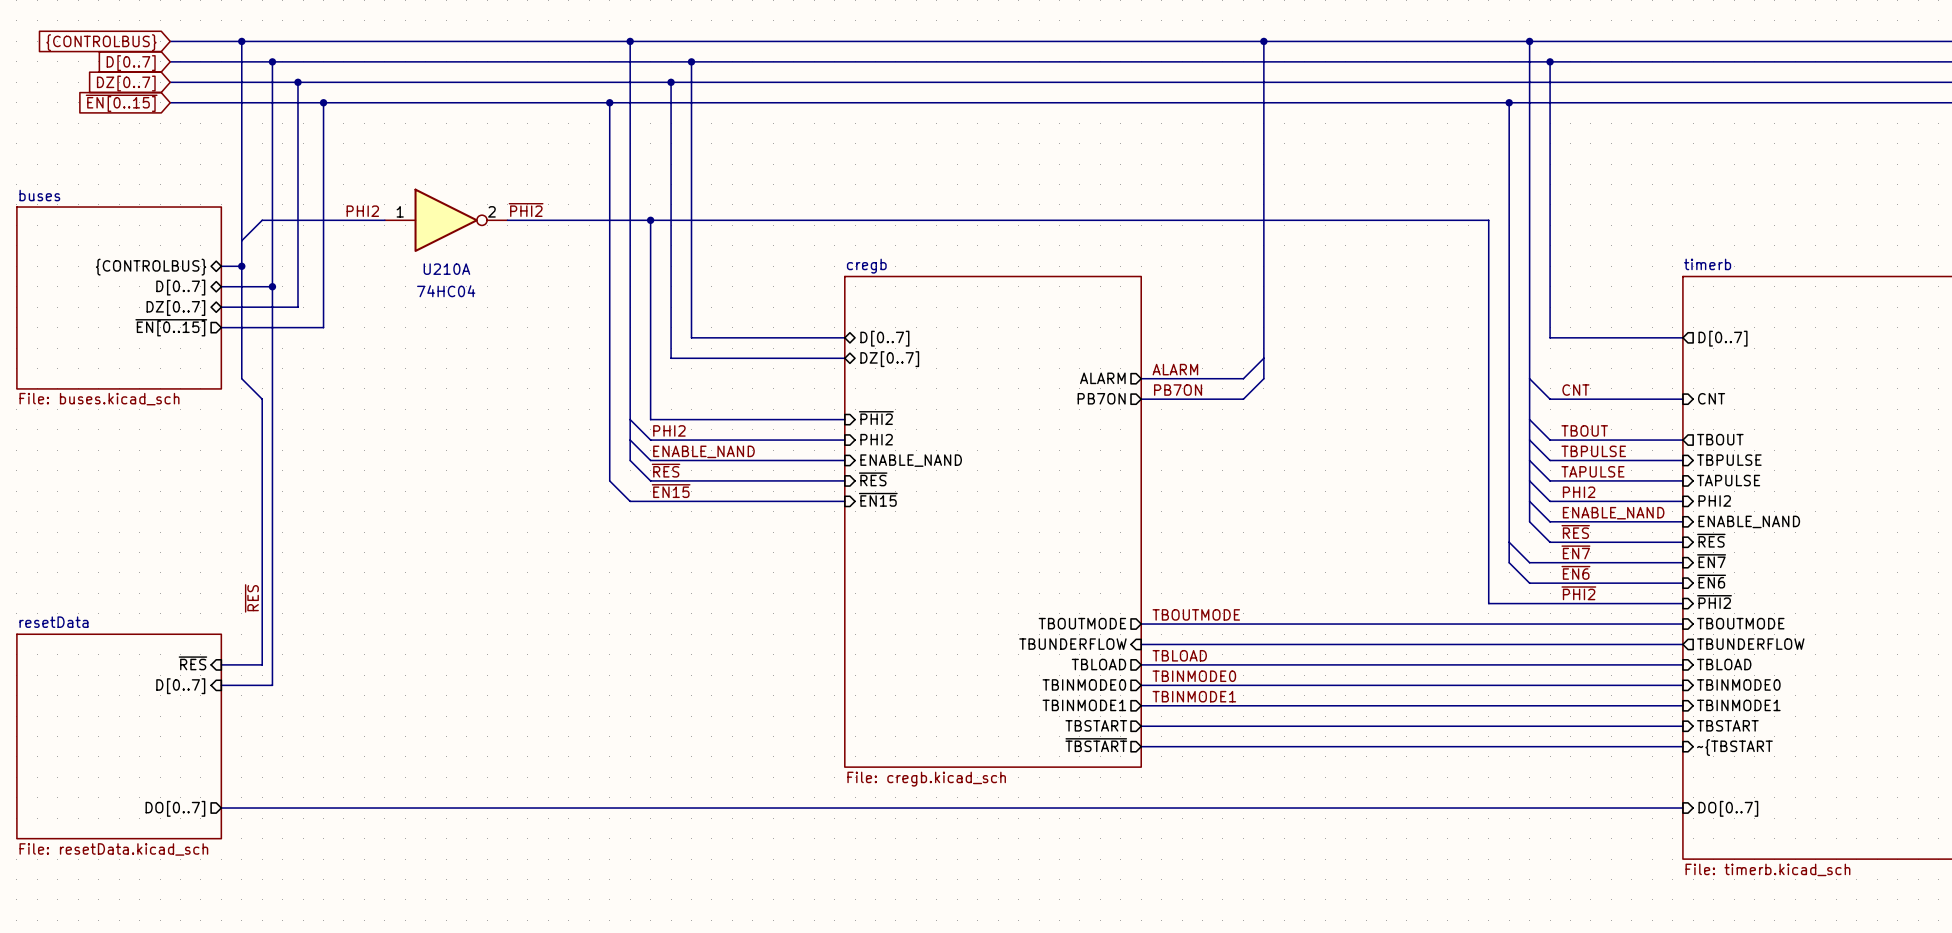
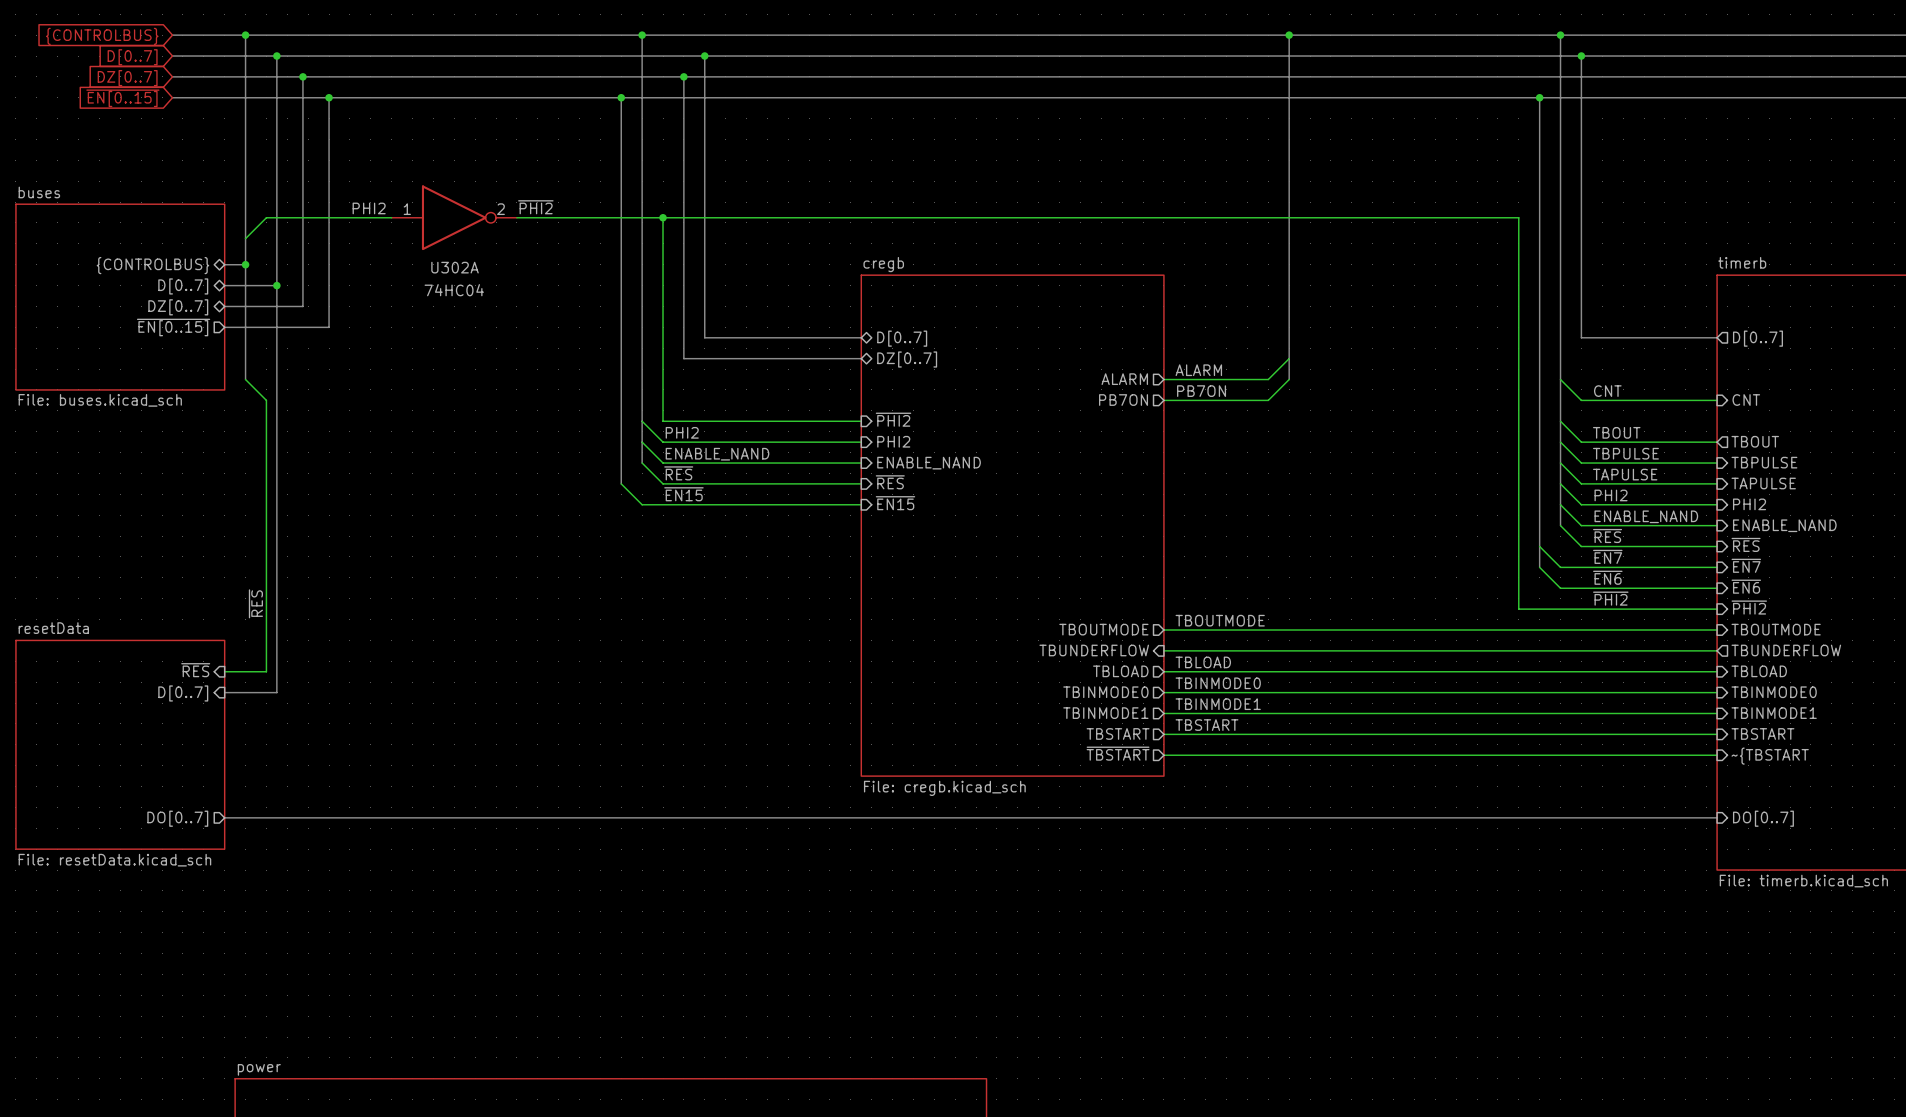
U210A name: U210A (446, 269) -> U302A (455, 267)
label: none -> TBSTART (1207, 725)

